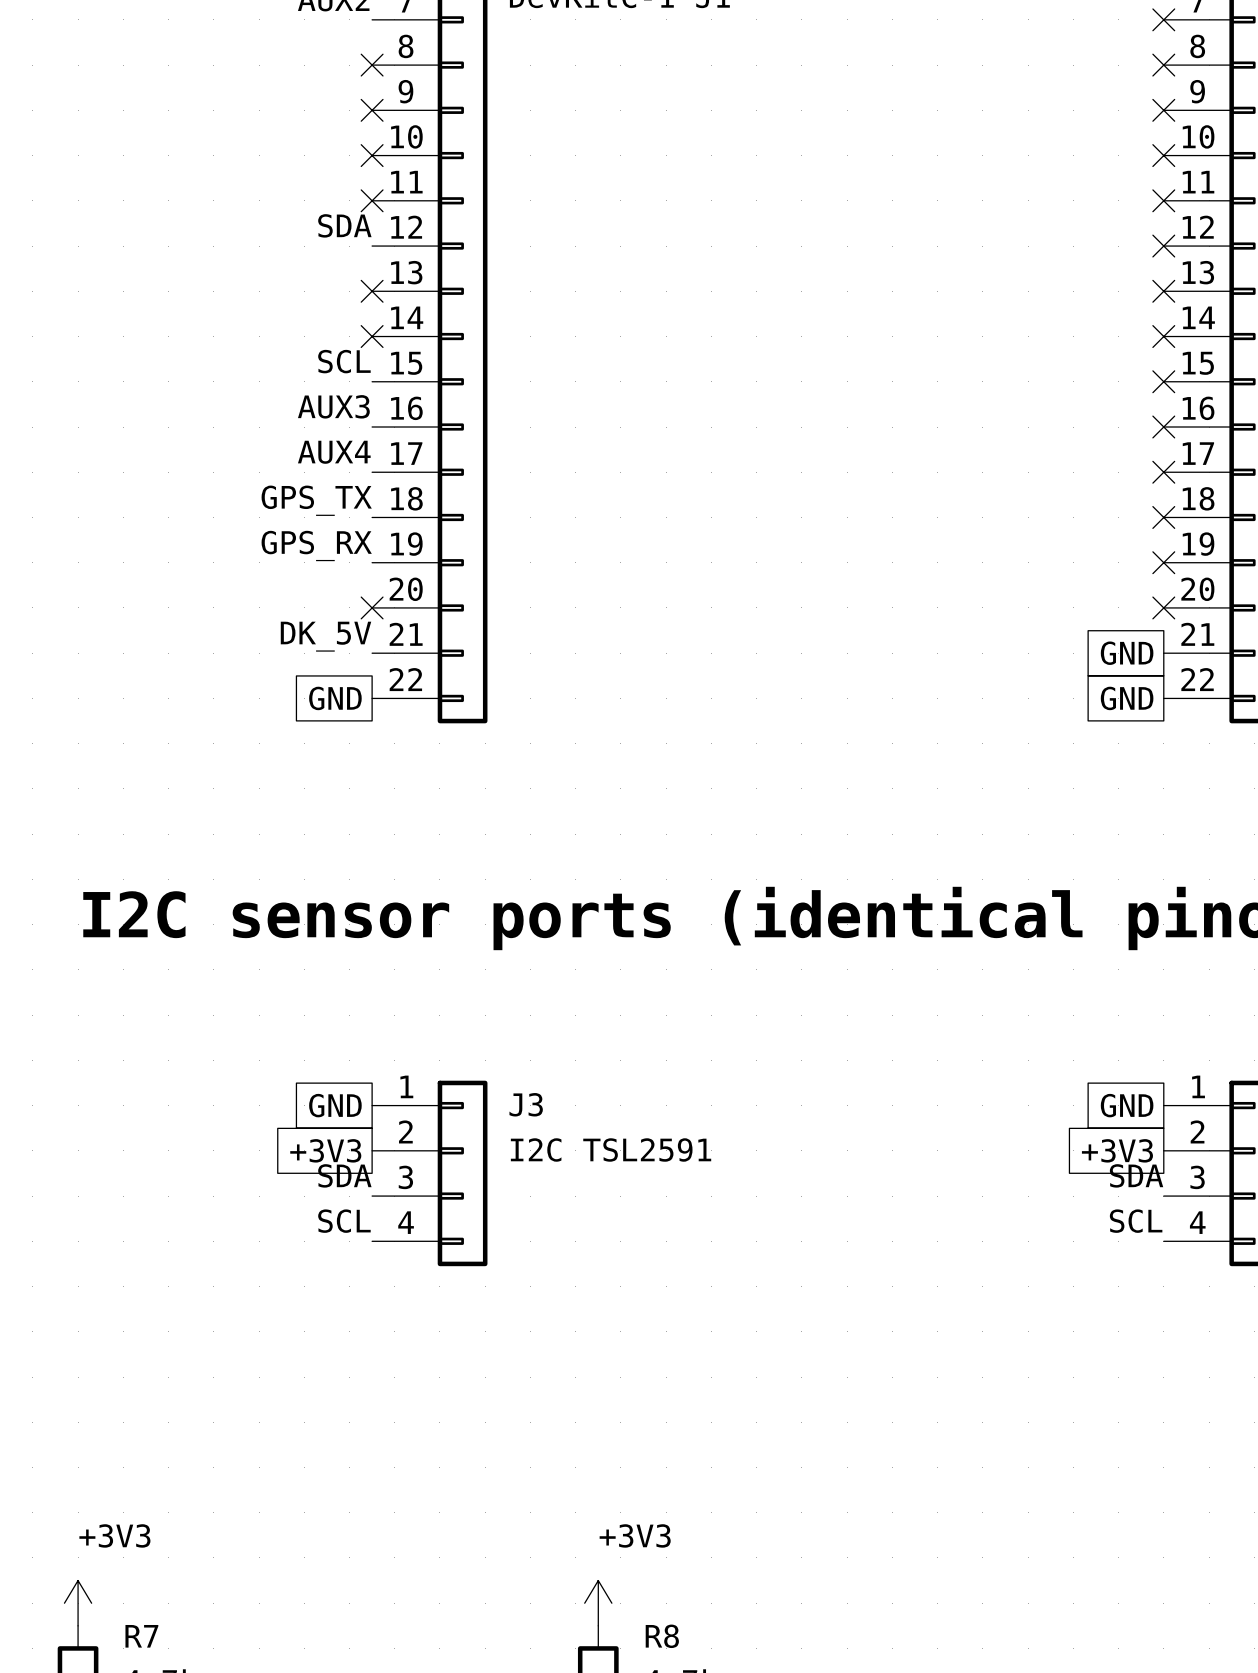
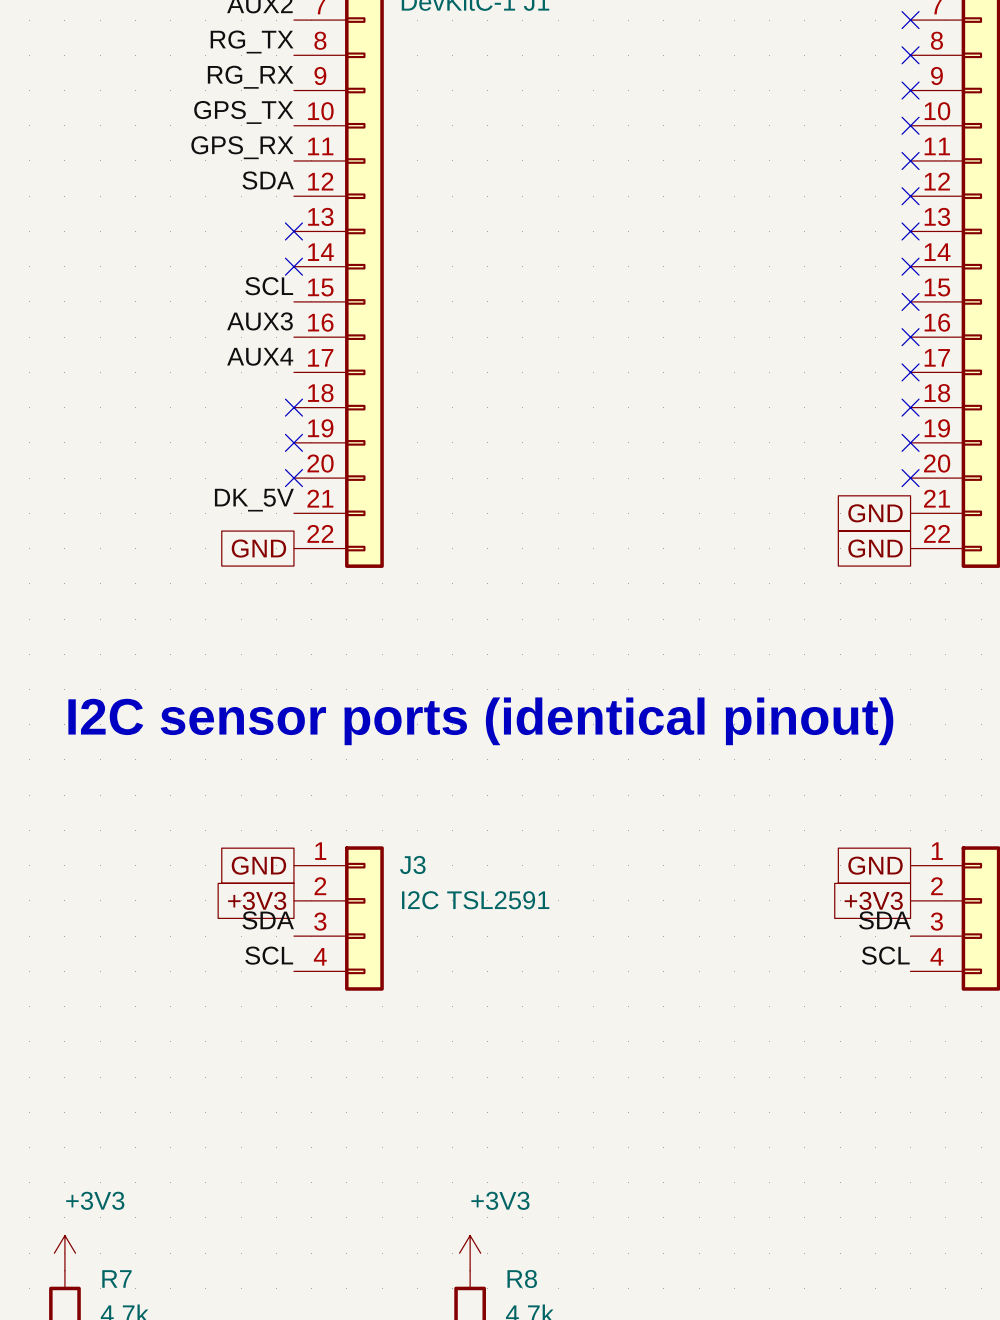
label: none -> RG_TX (252, 41)
no-connect mark: (372, 65) -> none
label: none -> RG_RX (250, 77)
no-connect mark: (372, 110) -> none
no-connect mark: (372, 155) -> none
no-connect mark: (372, 200) -> none
label position: GPS_TX (316, 500) -> GPS_TX (243, 112)
no-connect mark: none -> (293, 407)
label position: GPS_RX (316, 545) -> GPS_RX (242, 147)
no-connect mark: none -> (293, 442)

